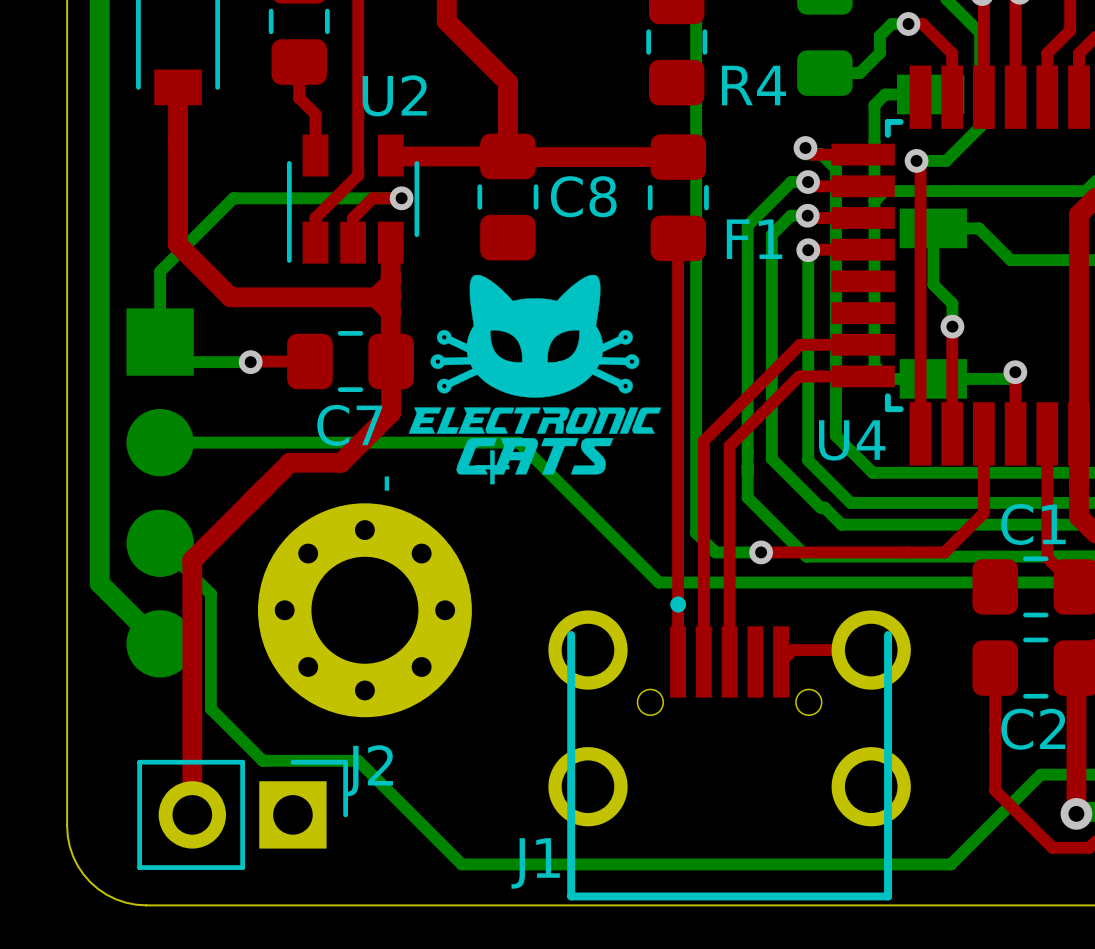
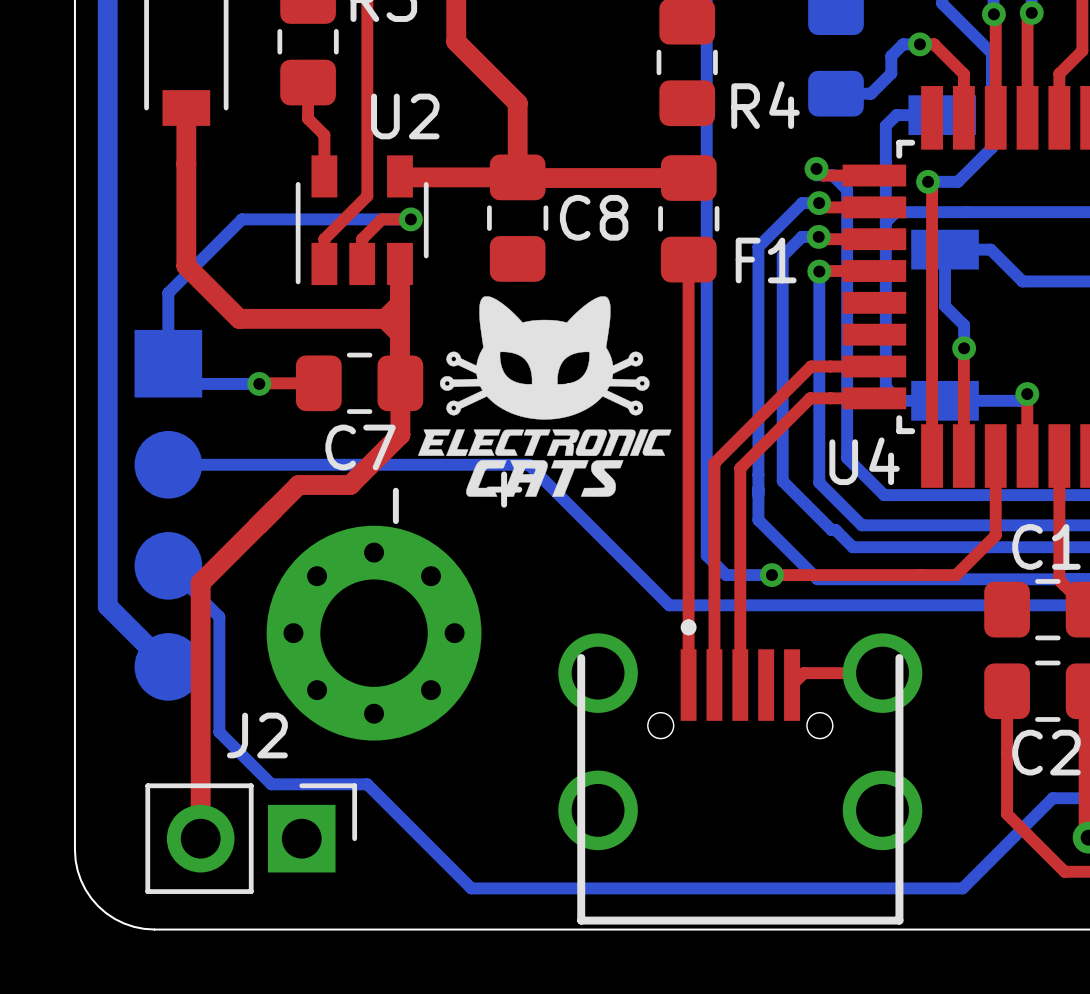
J2 name position: J2 (369, 770) -> J2 (257, 735)
J1 name: J1 (535, 863) -> none

